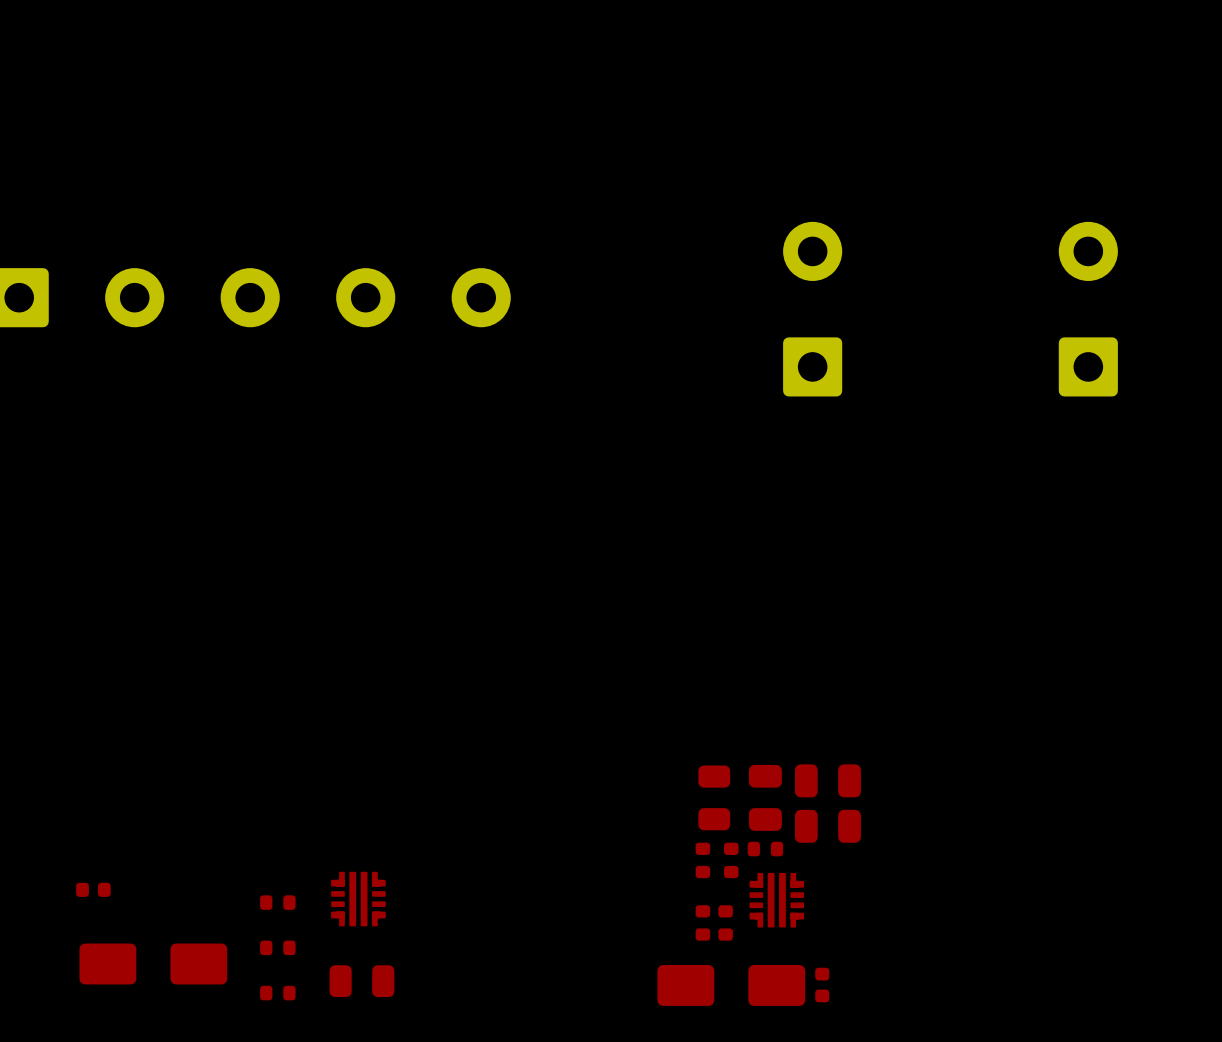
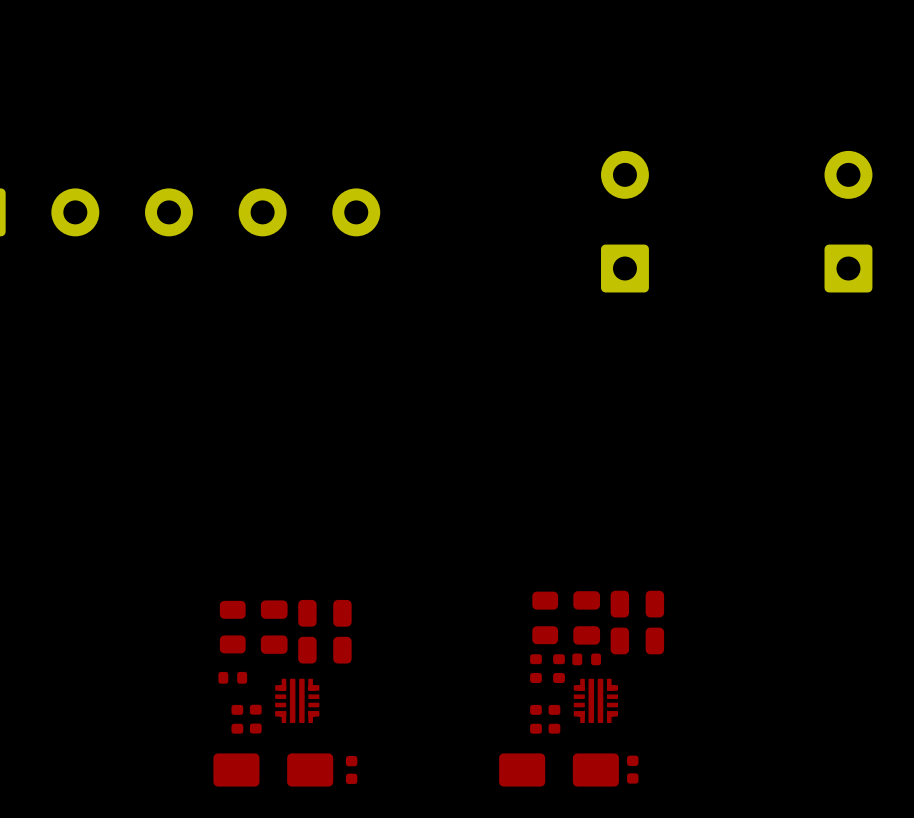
part: none -> (324, 613)
part: none -> (232, 627)
part: none -> (274, 627)
part: none -> (324, 650)
part: none -> (232, 677)
part rotation: 0° (93, 889) -> 90° clockwise (351, 769)
part position: (93, 889) -> (351, 769)
part position: (358, 899) -> (297, 700)
part: (277, 902) -> none
part: none -> (237, 719)
part: none -> (255, 719)
part: (277, 947) -> none
part: (153, 963) -> none
part footprint: [329, 965, 395, 998] -> [213, 753, 334, 787]
part: (277, 993) -> none

